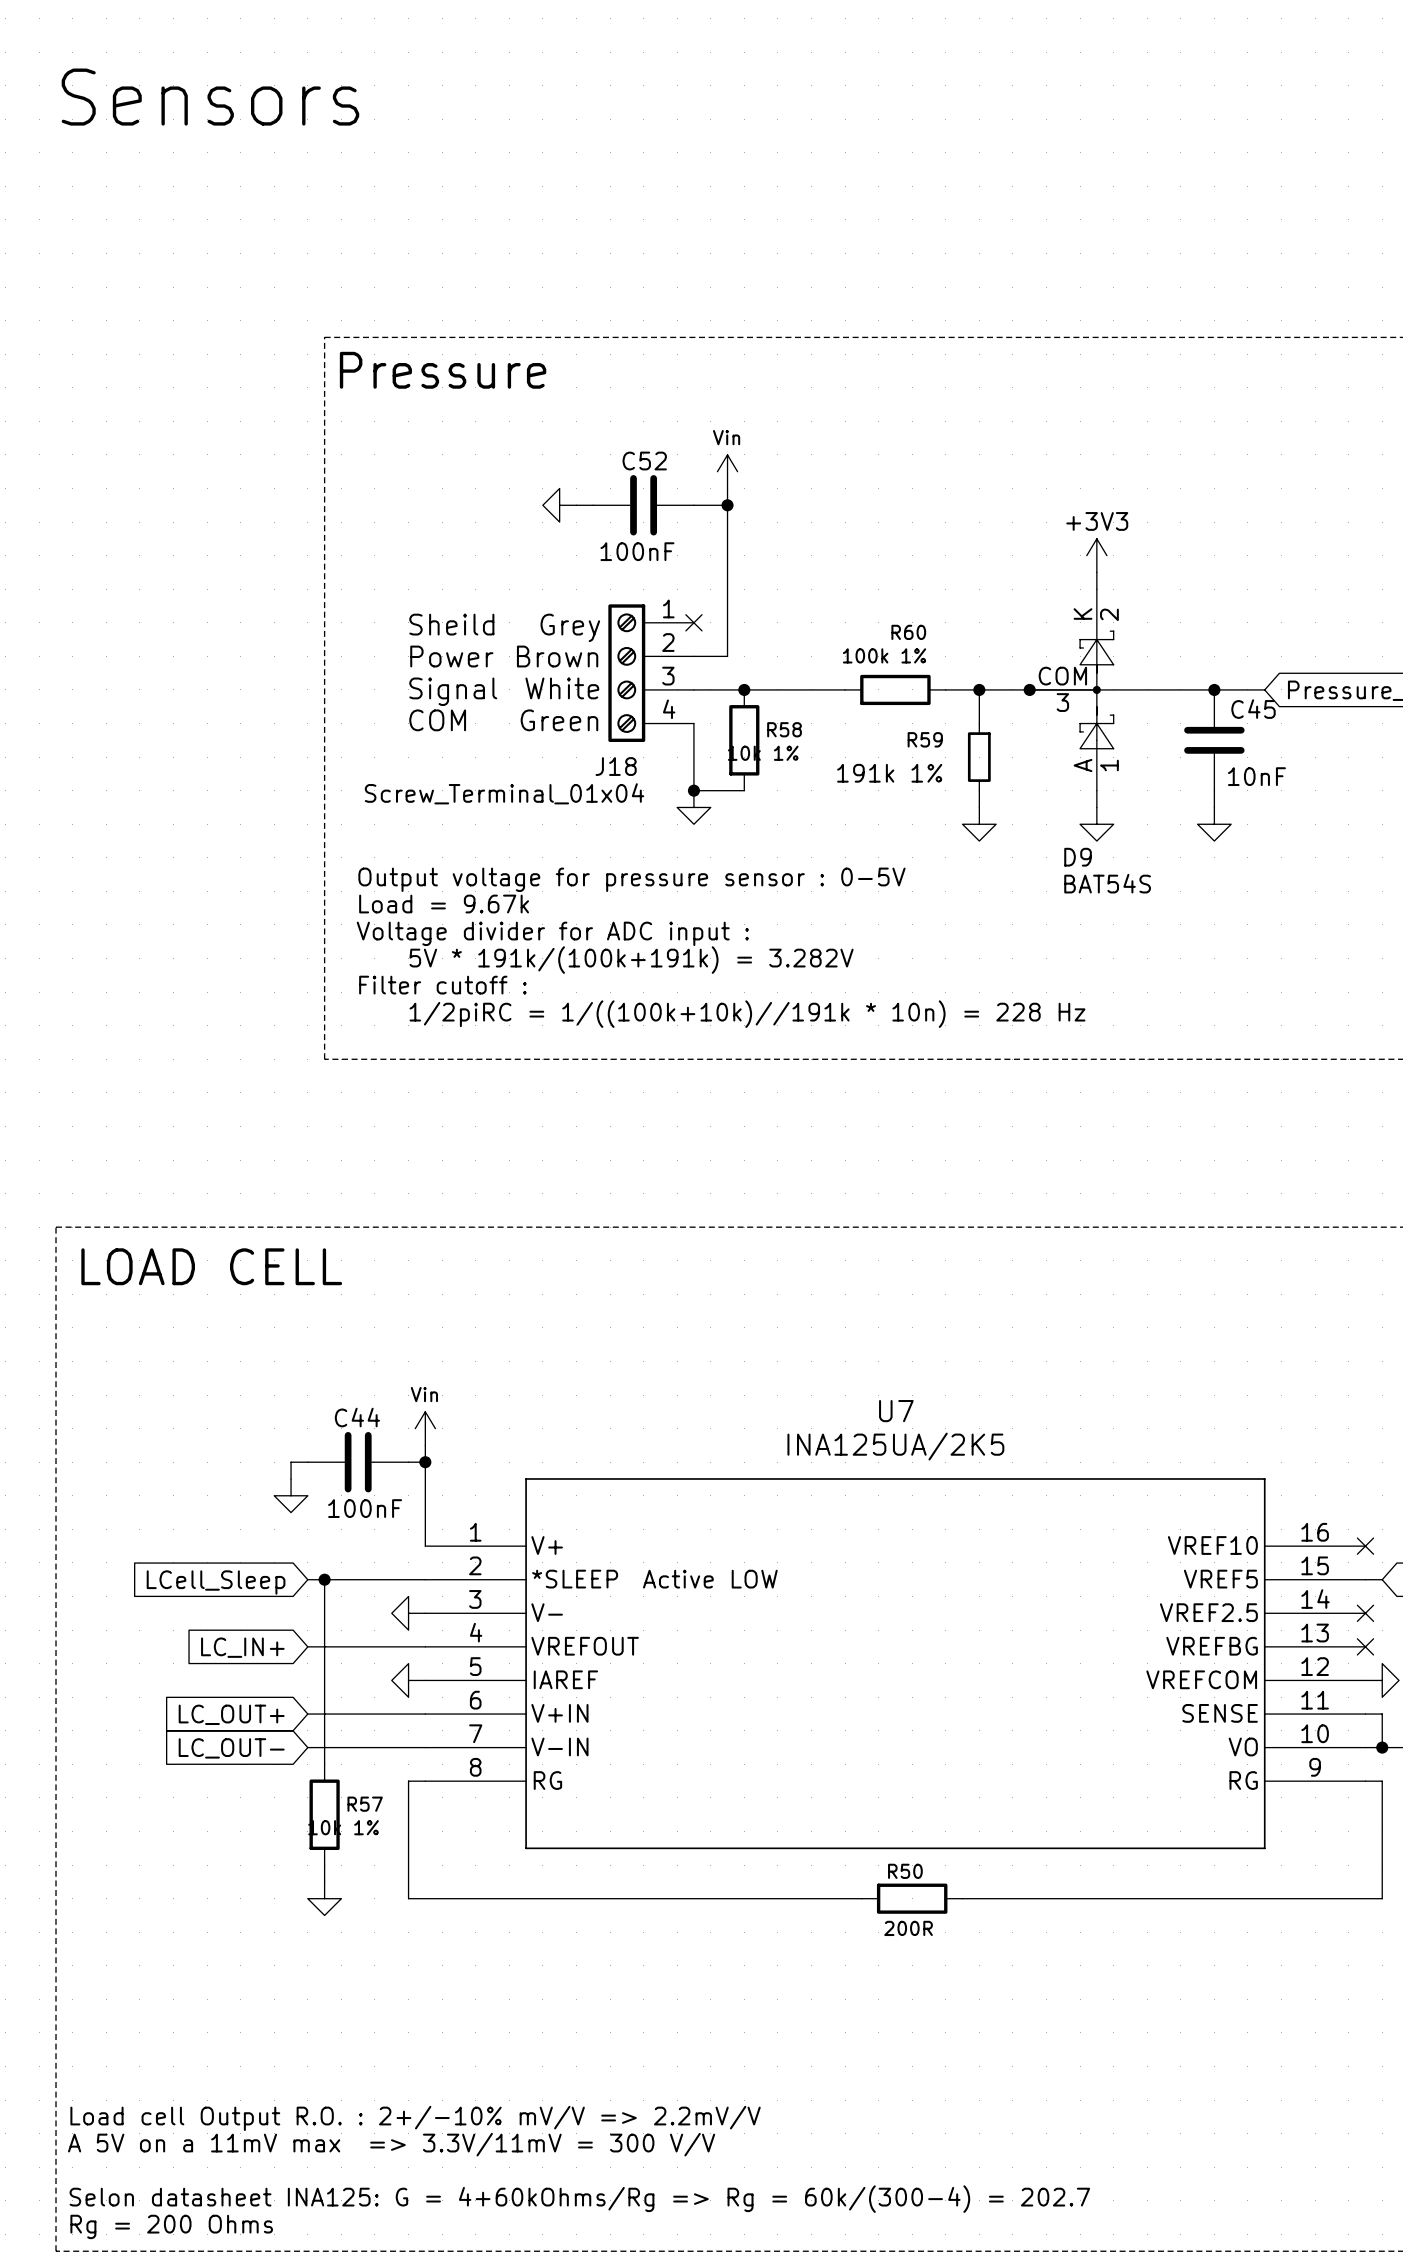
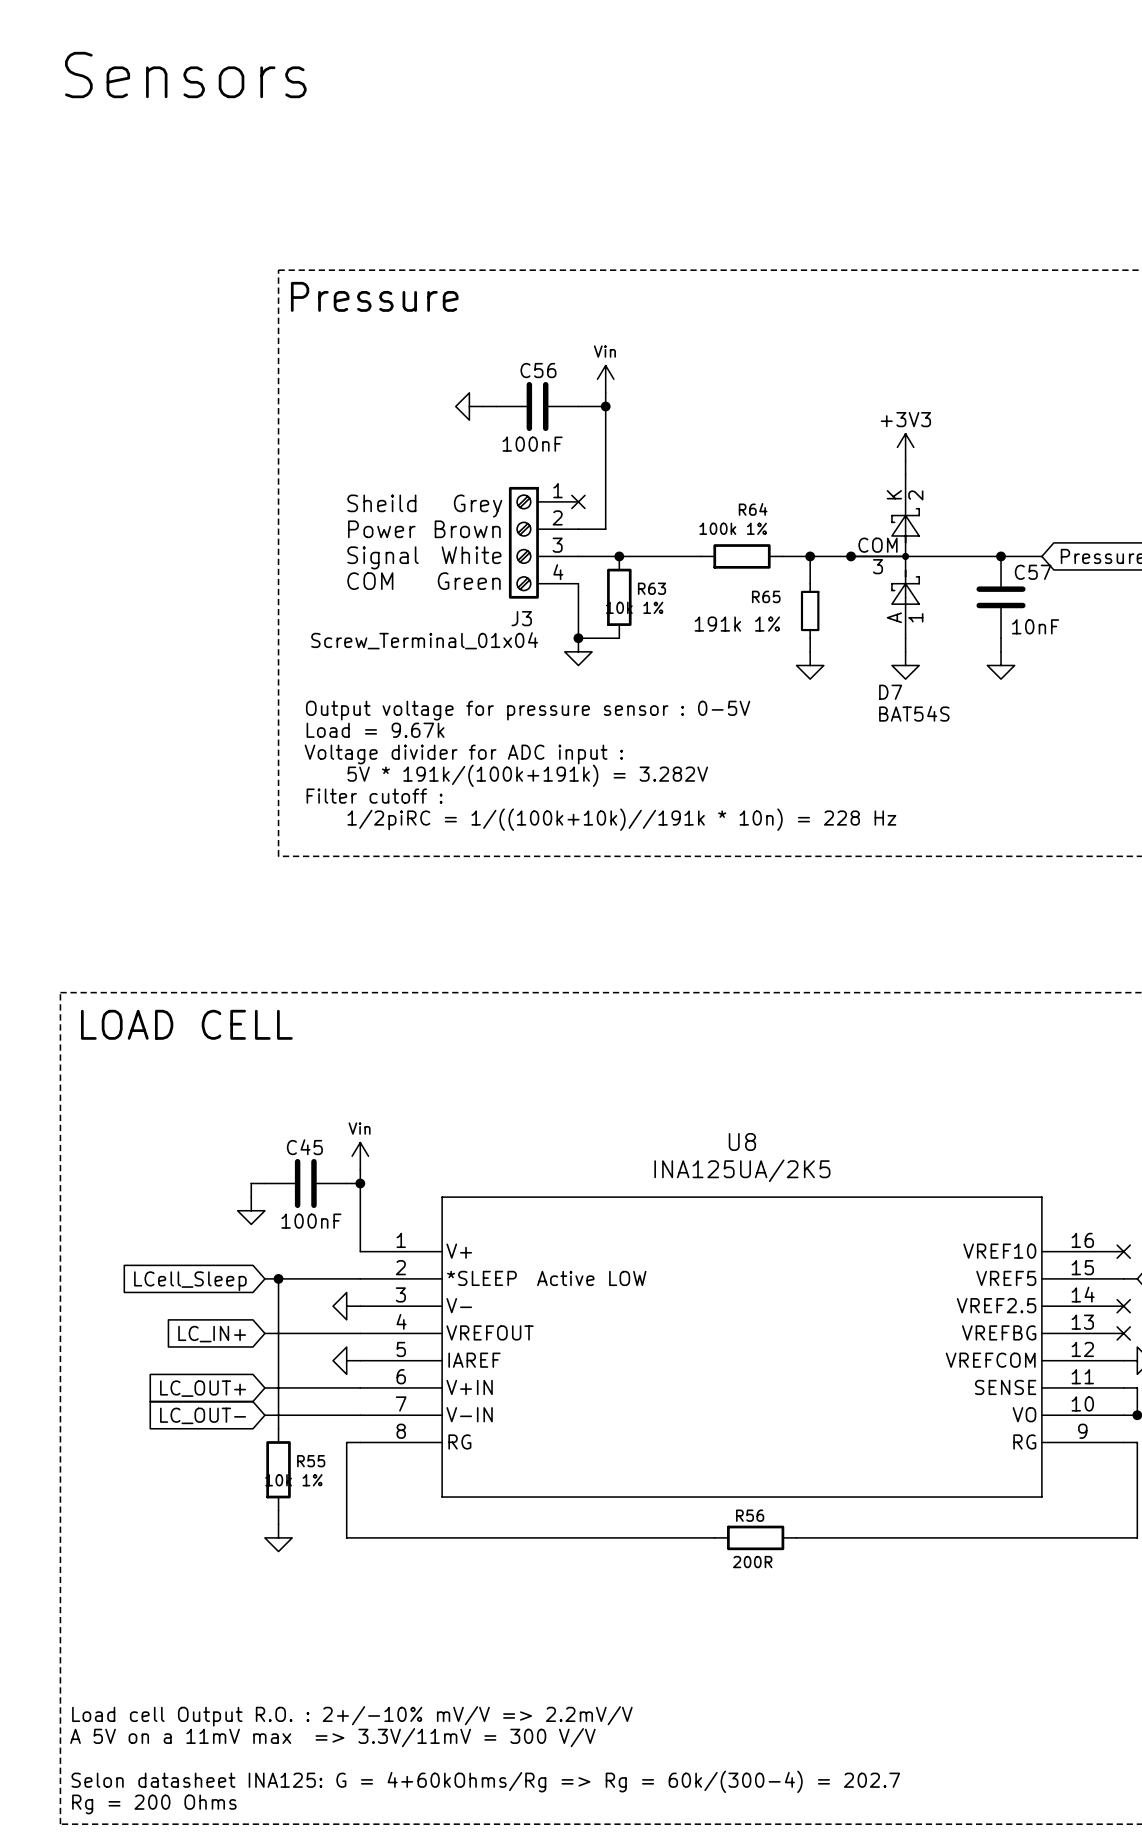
C52 name: C52 (644, 461) -> C56 (538, 370)
R60 name: R60 (908, 632) -> R64 (753, 509)
C45 name: C45 (1253, 709) -> C57 (1033, 572)
R58 name: R58 (784, 729) -> R63 (651, 588)
R59 name: R59 (925, 739) -> R65 (766, 596)
J18 name: J18 (616, 766) -> J3 (521, 618)
D9 name: D9 (1078, 857) -> D7 (890, 692)
U7 name: U7 (896, 1411) -> U8 (742, 1141)
C44 name: C44 (357, 1417) -> C45 (304, 1147)
R57 name: R57 (365, 1804) -> R55 (311, 1461)
R50 name: R50 (905, 1871) -> R56 (750, 1515)

